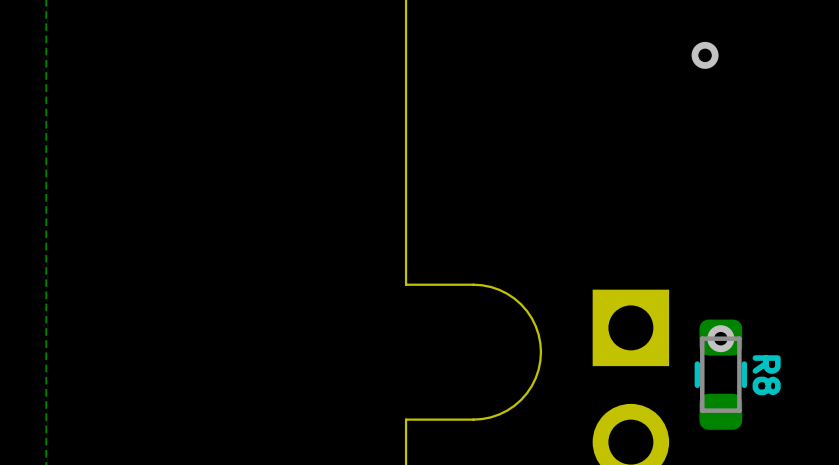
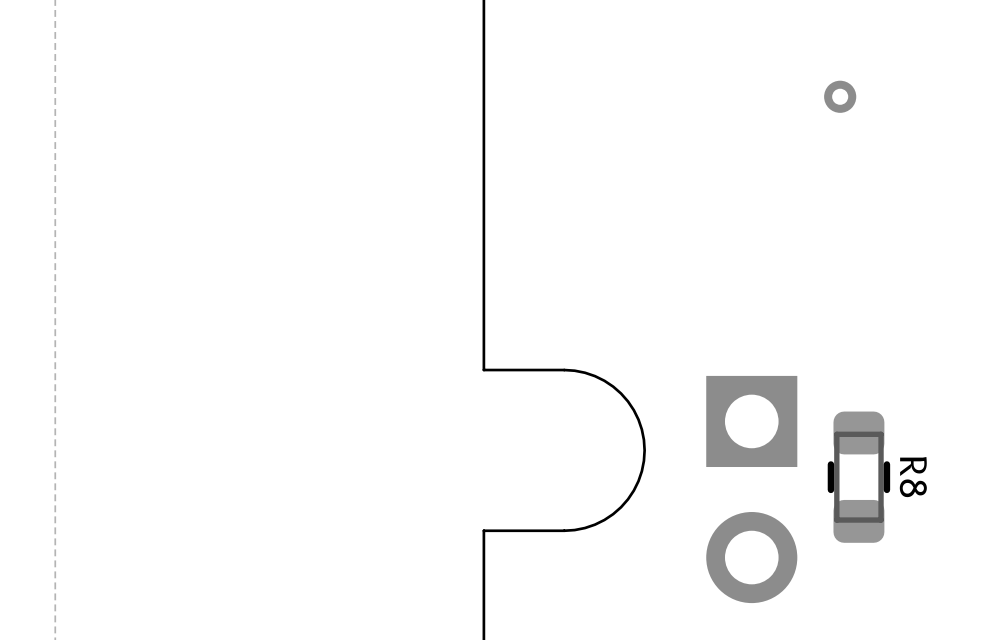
via: (720, 338) -> none

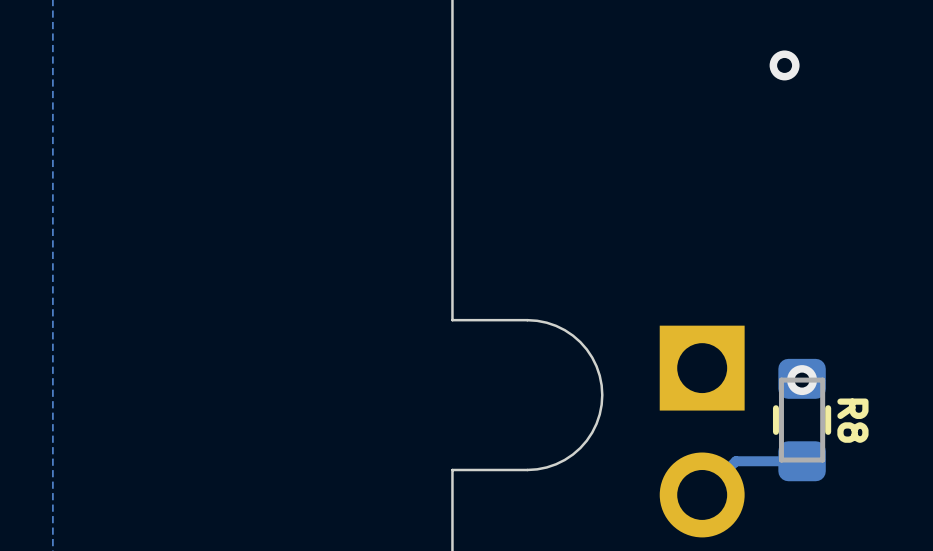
via: none -> (802, 380)
track: none -> (802, 461) (735, 461) (702, 494)

